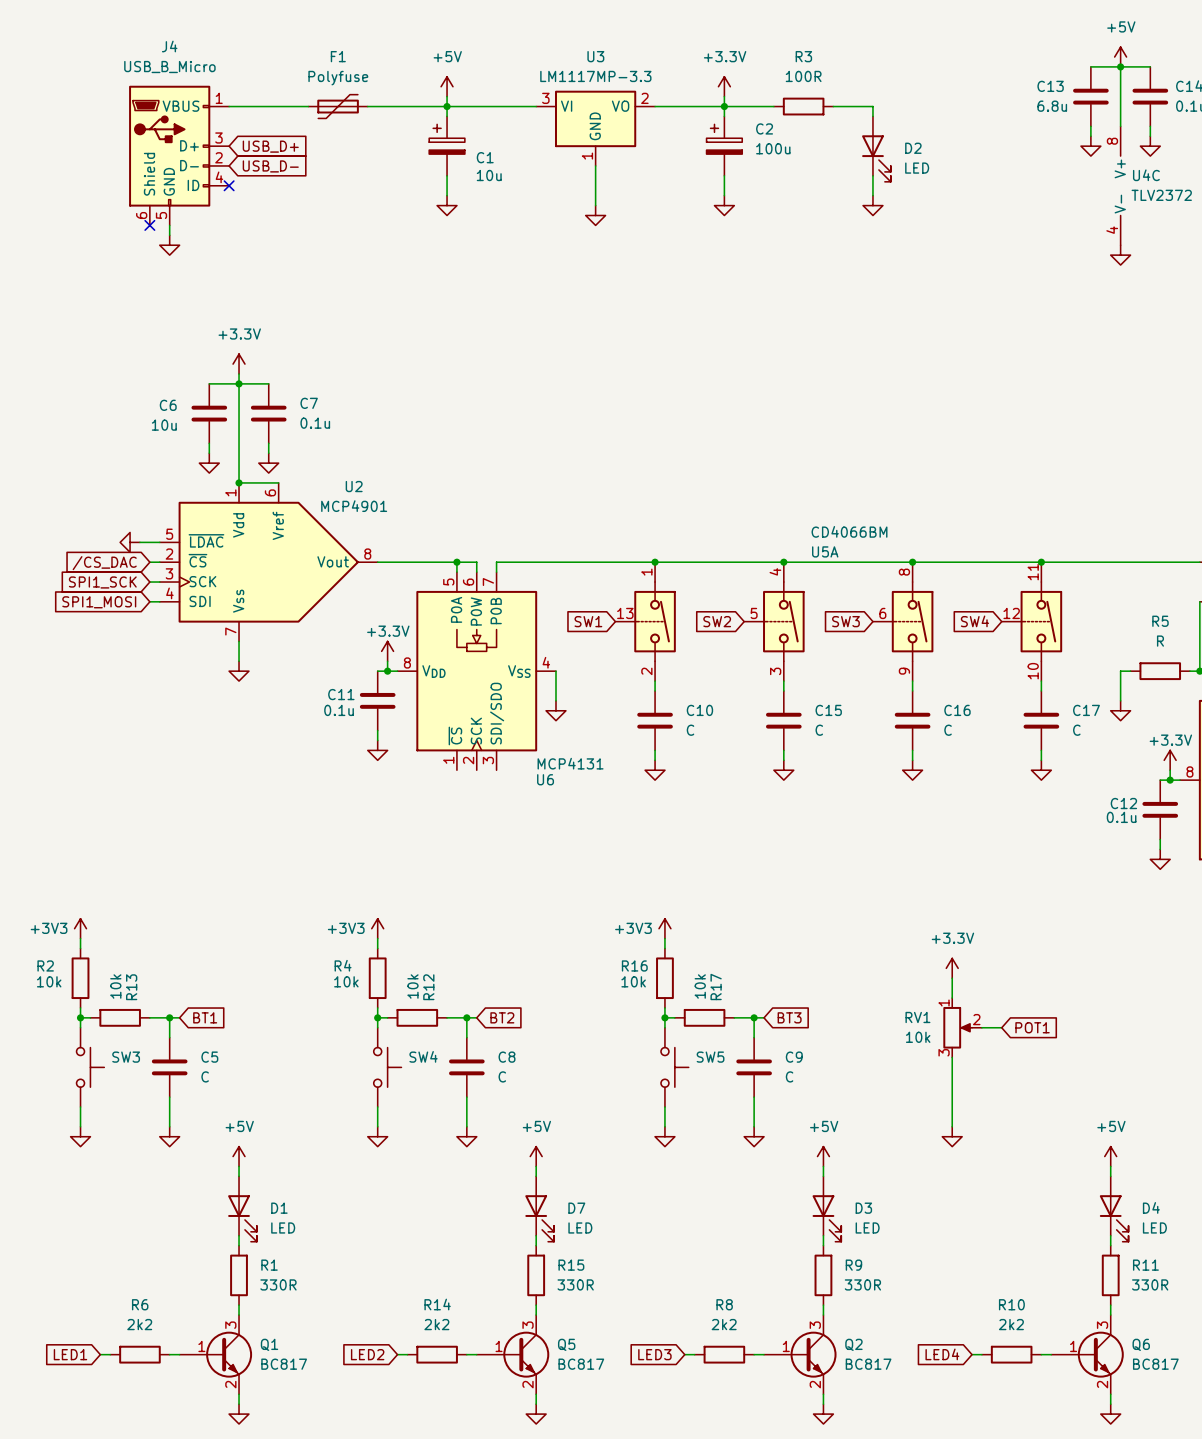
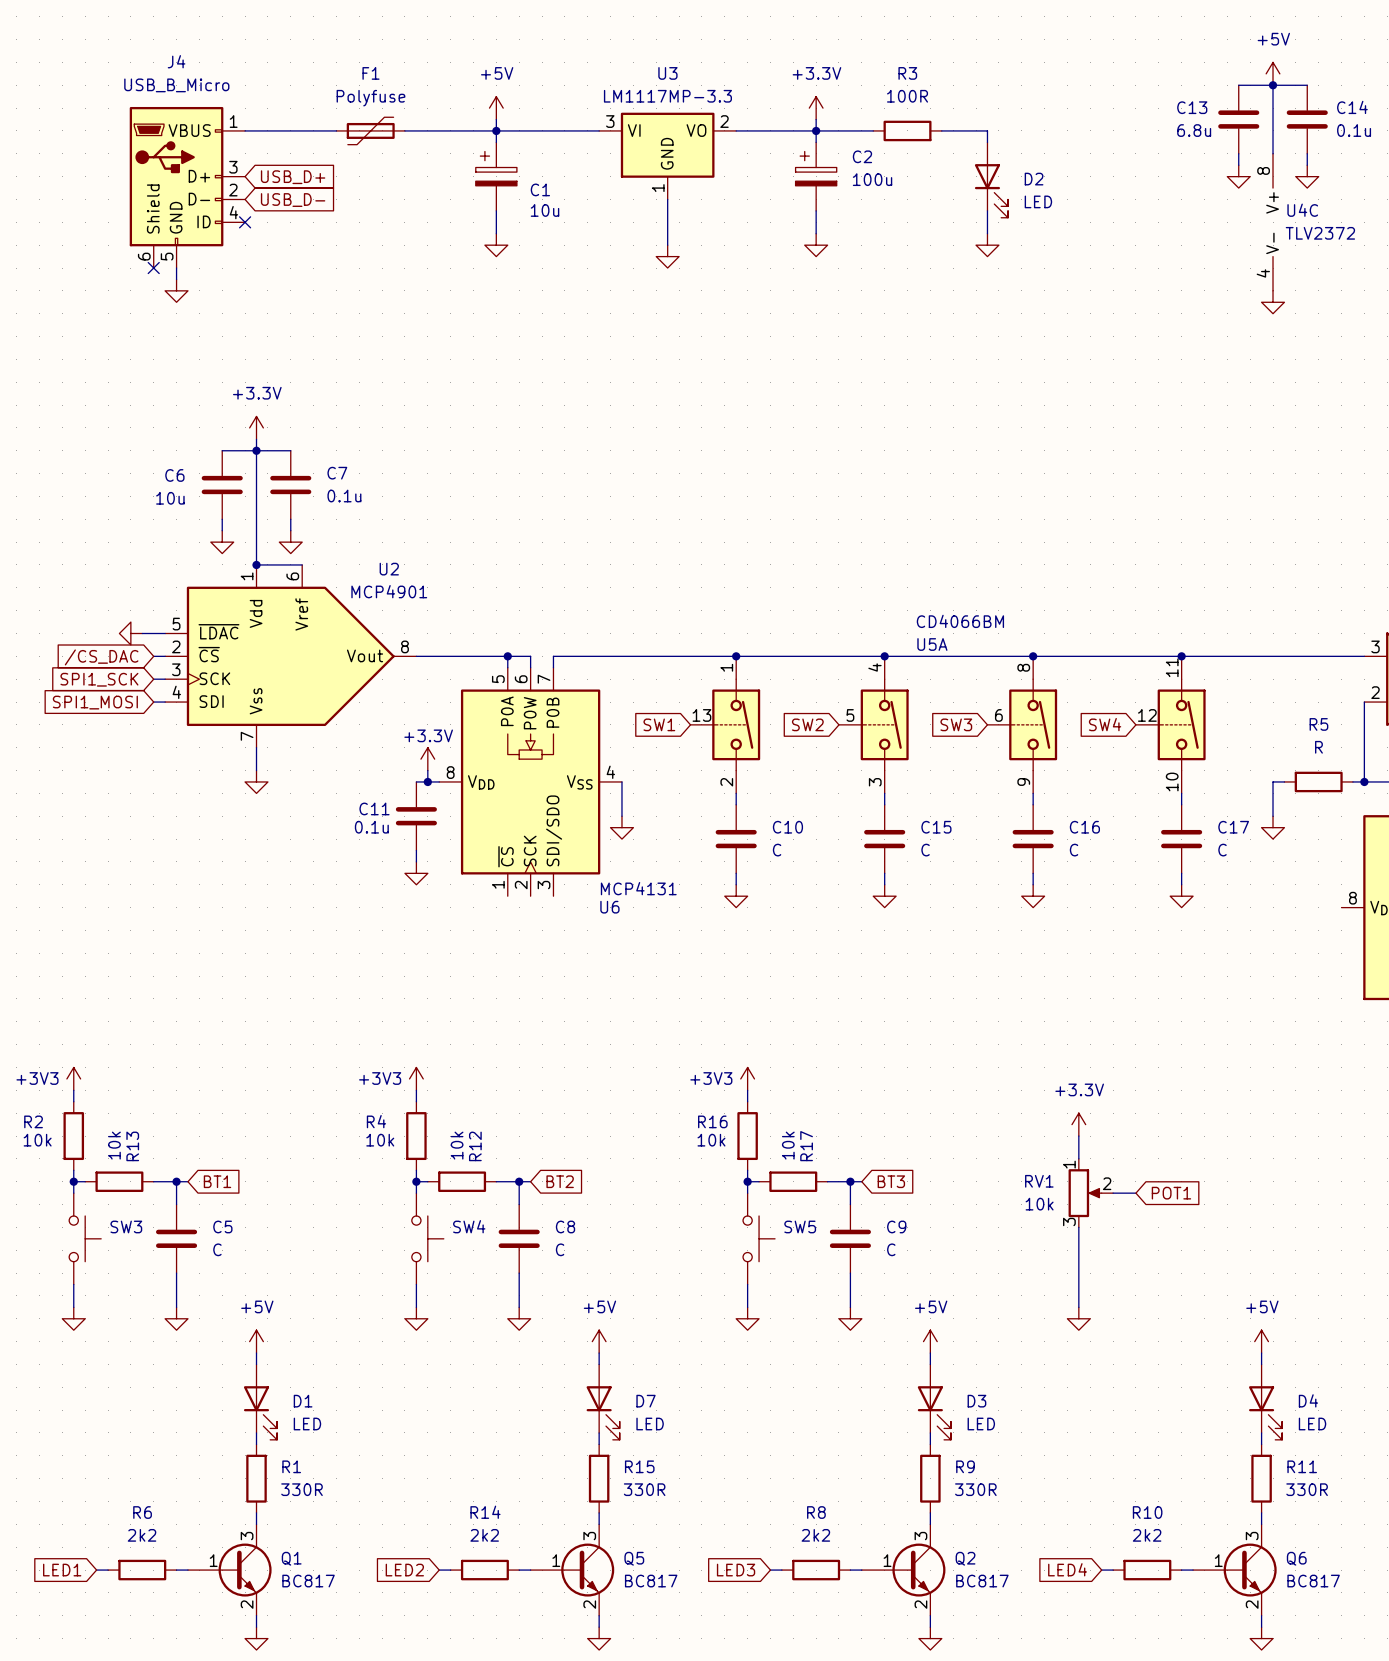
power symbol: +3.3V (1170, 760) -> none
wire: (1170, 770) (1170, 780) -> none
wire: (1160, 780) (1180, 780) -> none
junction: (1170, 780) -> none
C12: 0.1u (1160, 809) -> none
wire: (1160, 839) (1160, 849) -> none
power symbol: (1160, 859) -> none

